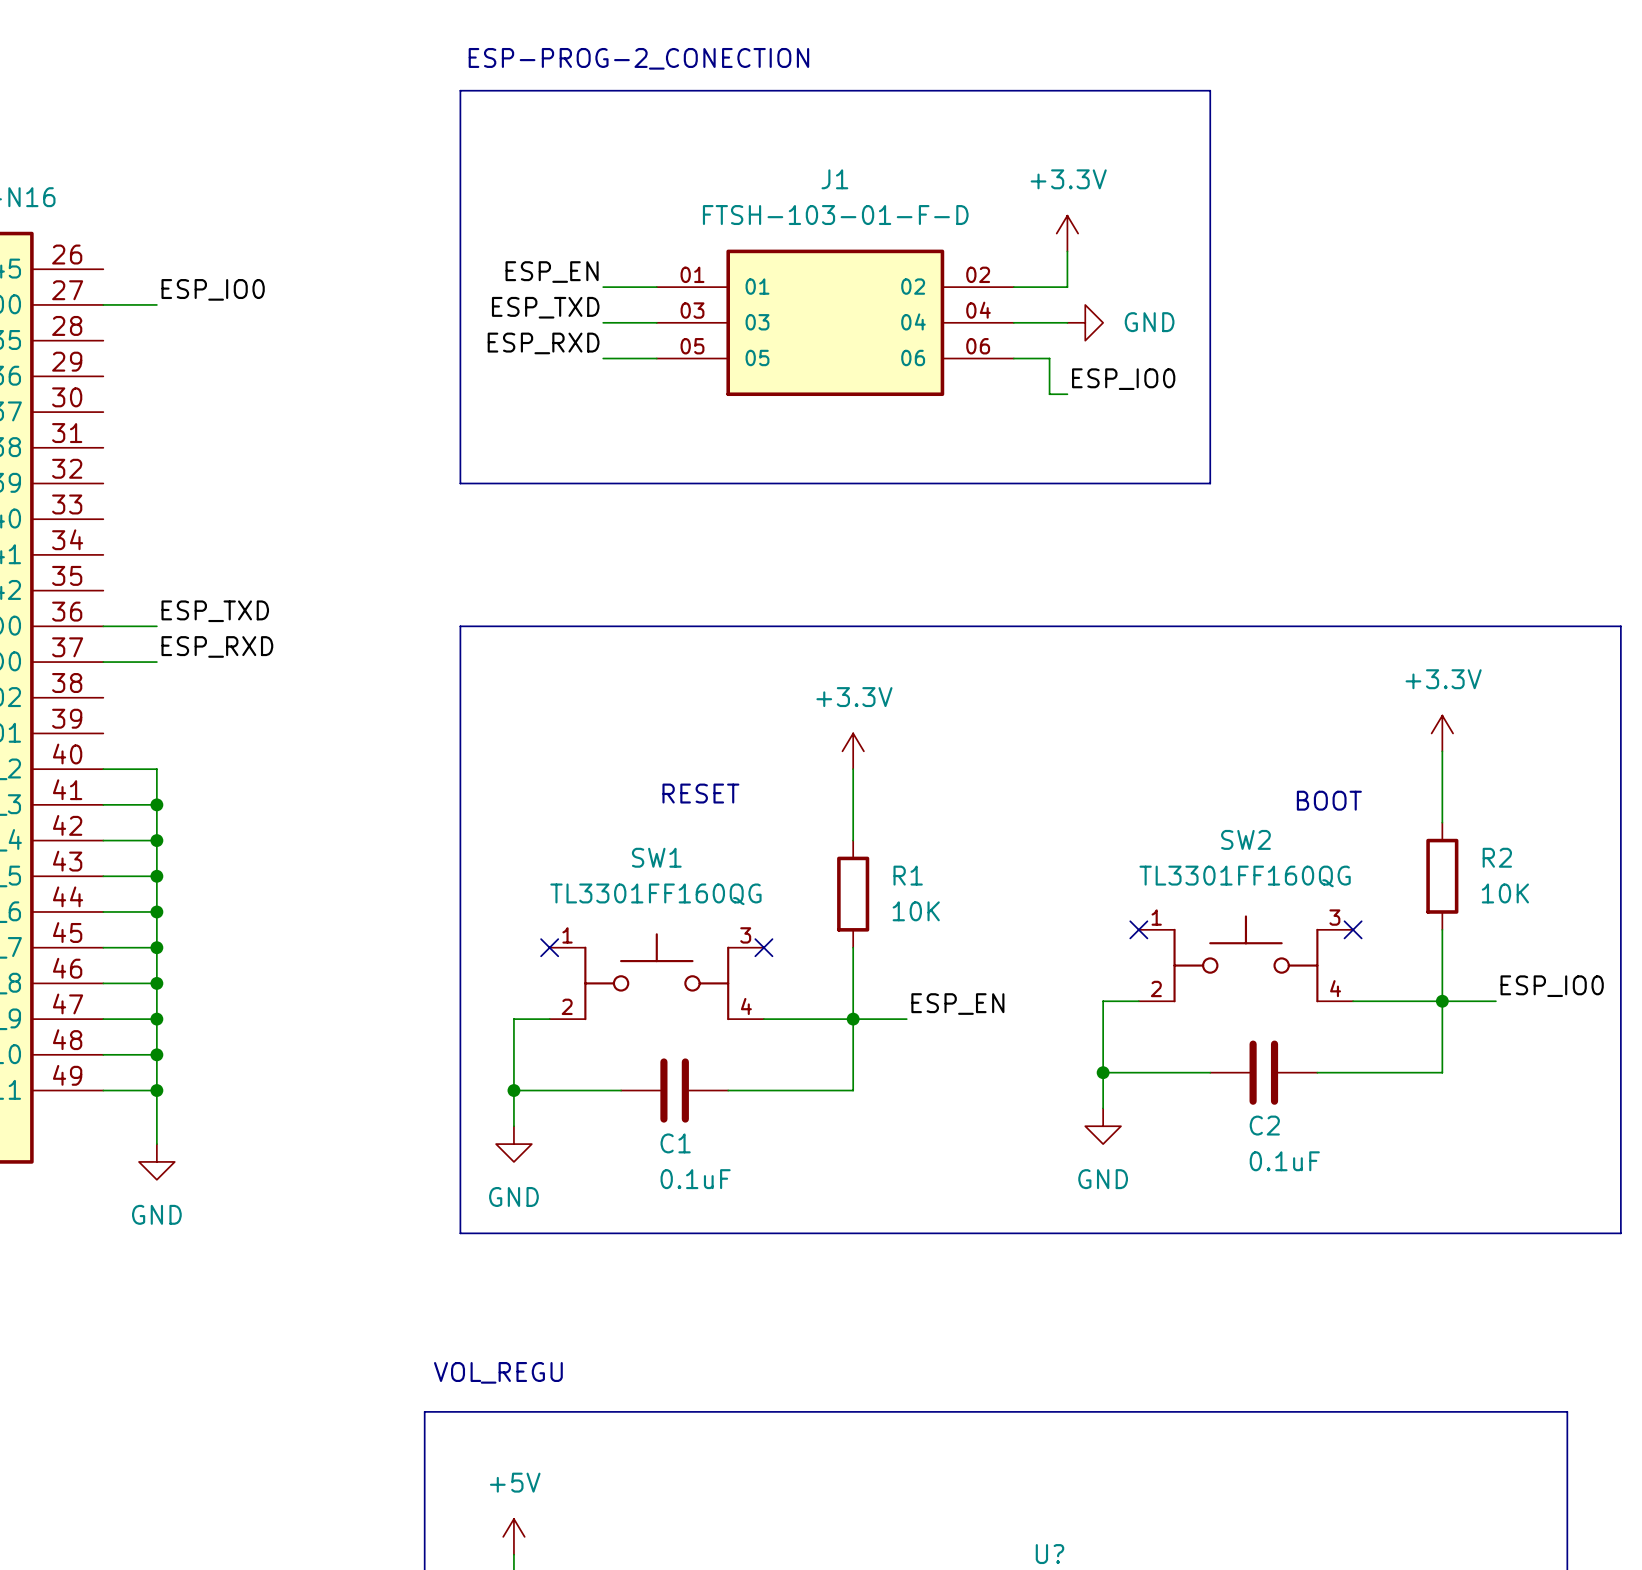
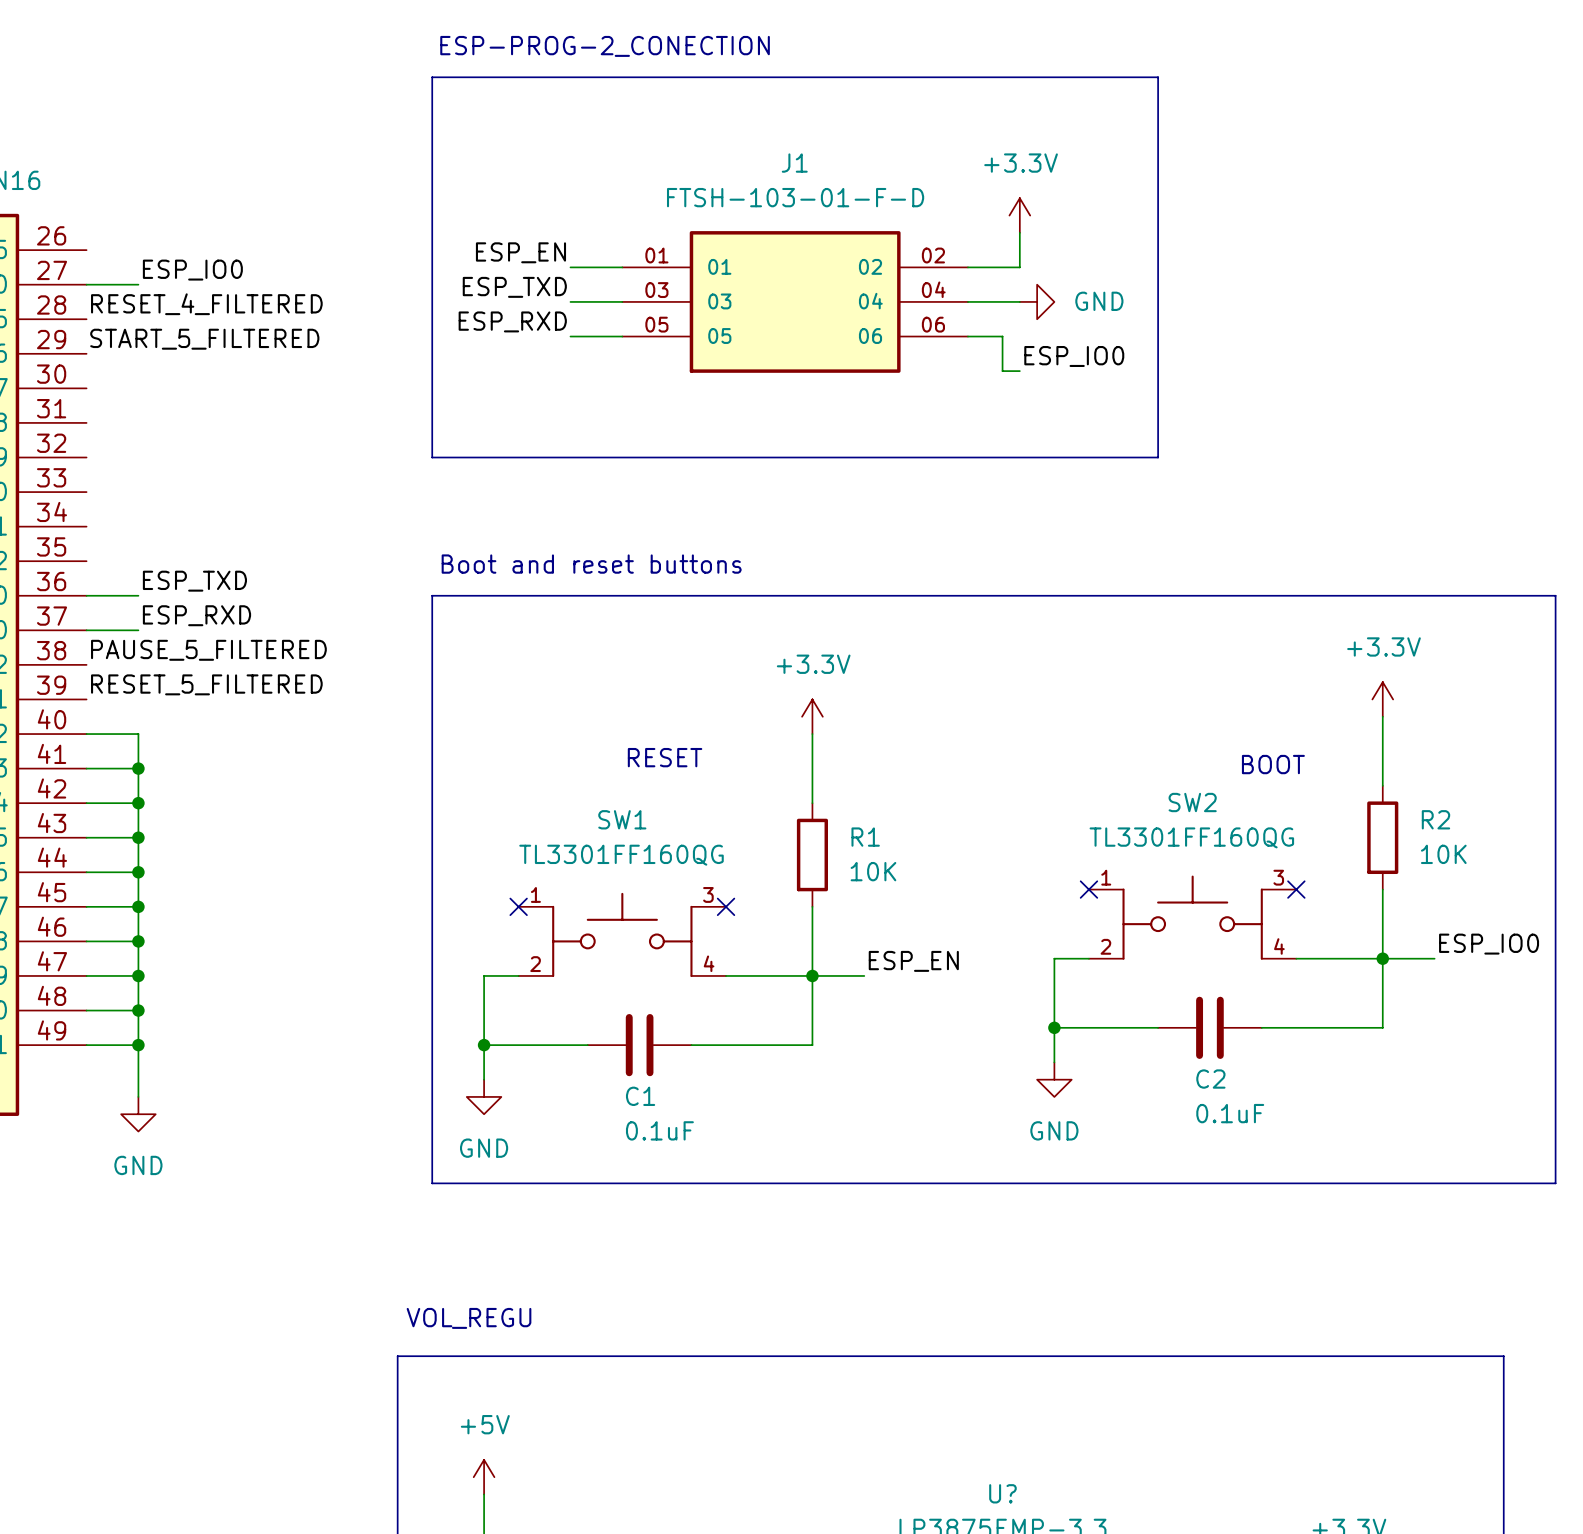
label: none -> RESET_4_FILTERED (206, 304)
label: none -> START_5_FILTERED (204, 339)
text: none -> Boot and reset buttons (591, 564)
label: none -> PAUSE_5_FILTERED (208, 650)
label: none -> RESET_5_FILTERED (206, 684)

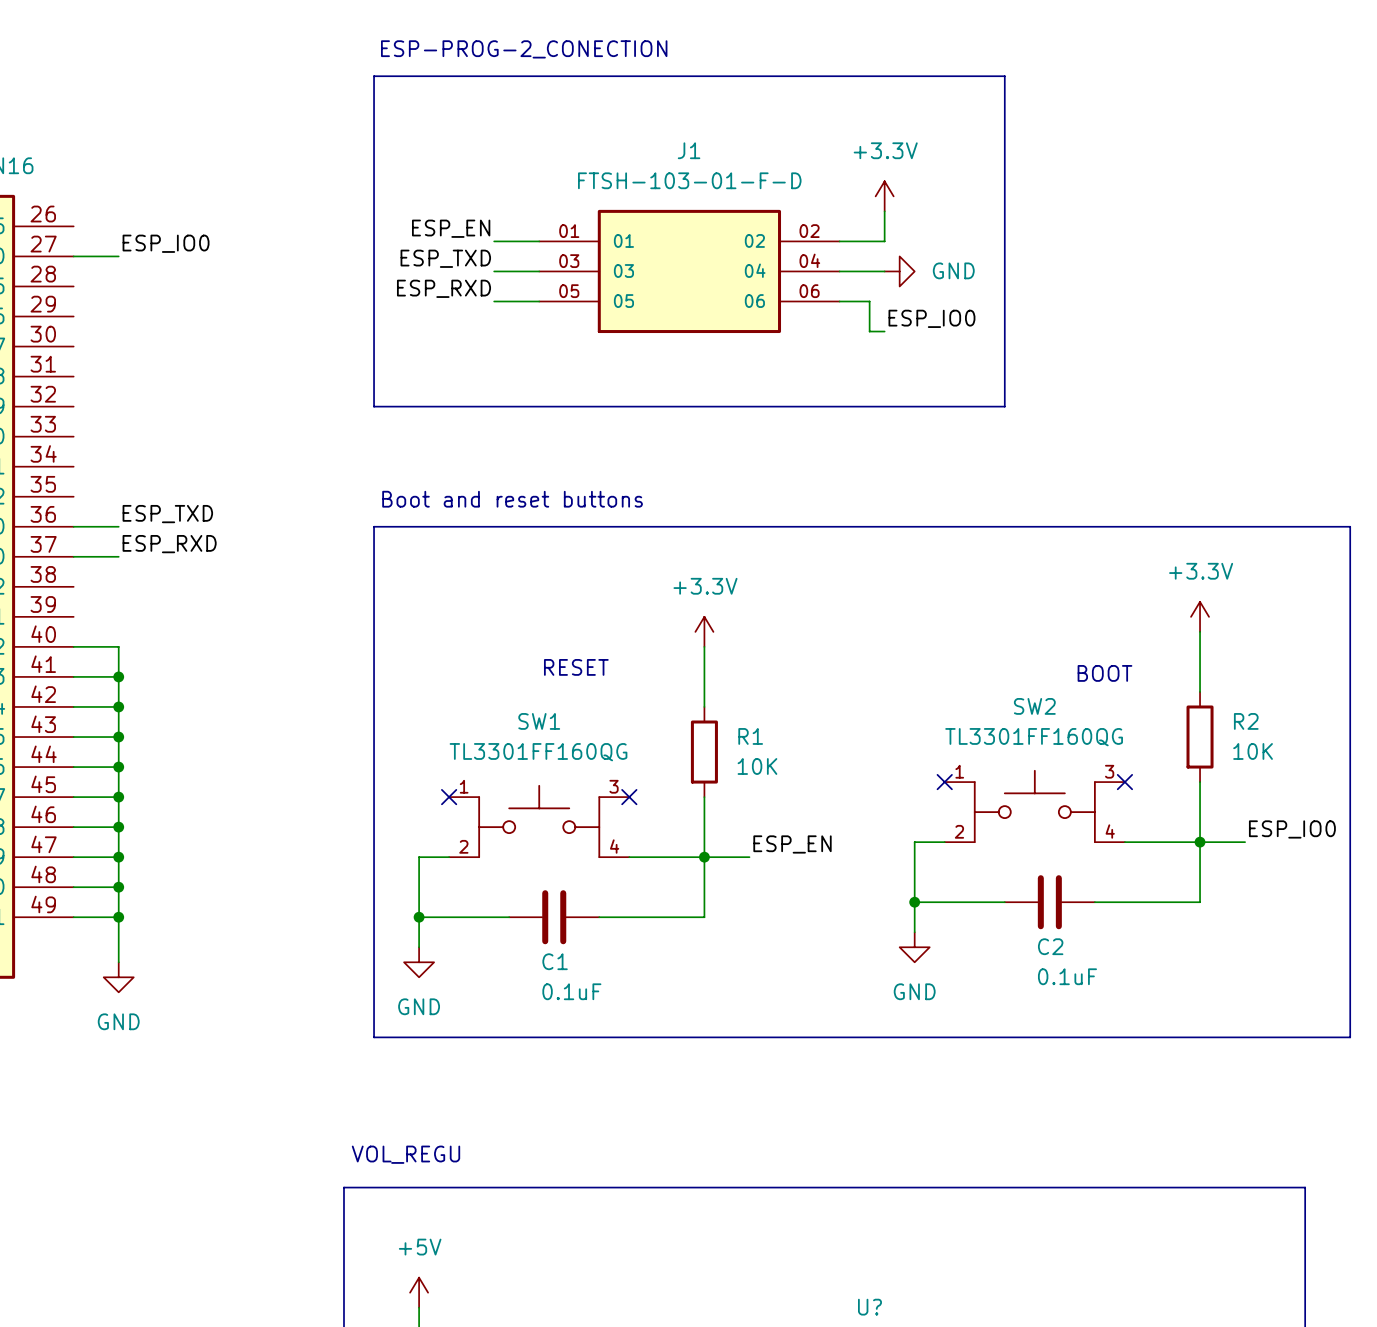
label: RESET_4_FILTERED (206, 304) -> none
label: START_5_FILTERED (204, 339) -> none
label: PAUSE_5_FILTERED (208, 650) -> none
label: RESET_5_FILTERED (206, 684) -> none

